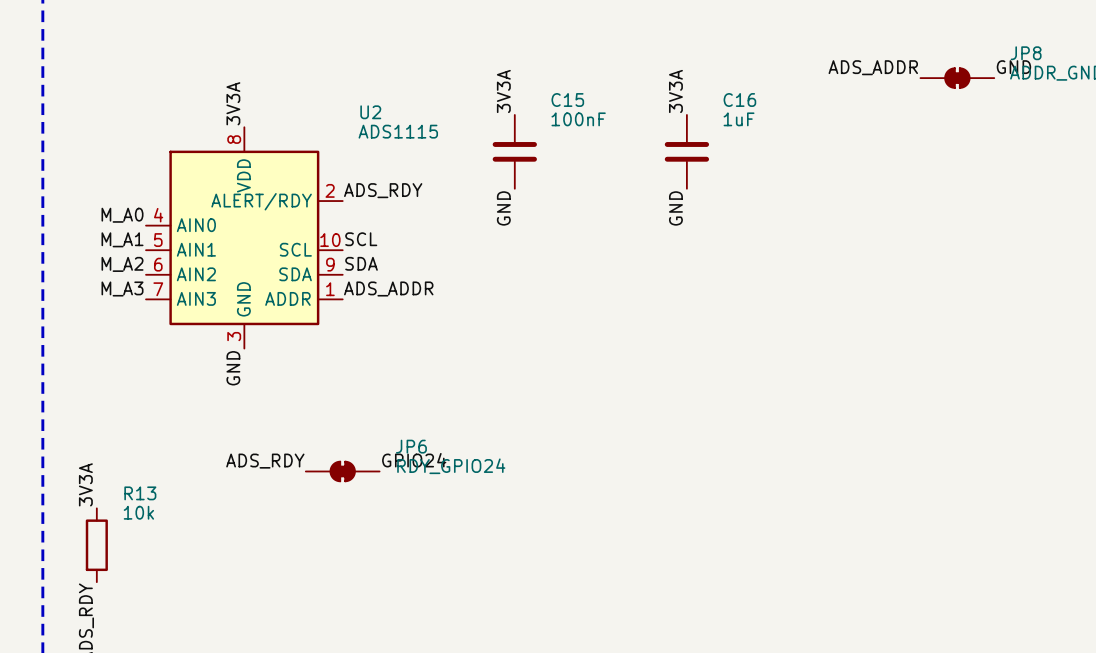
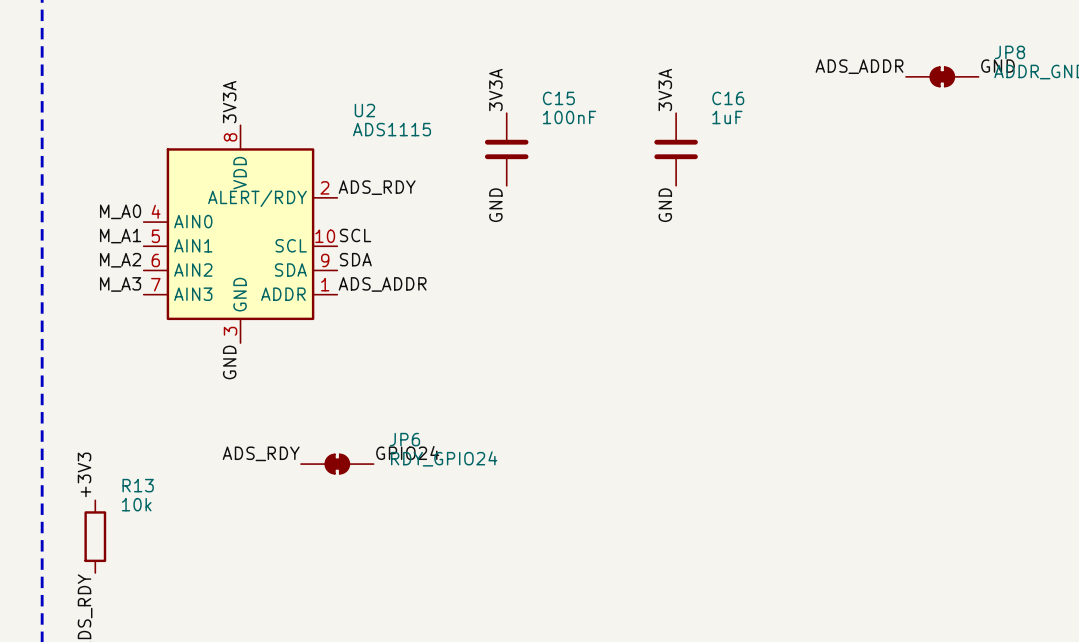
label: 3V3A (85, 484) -> +3V3 (84, 474)

